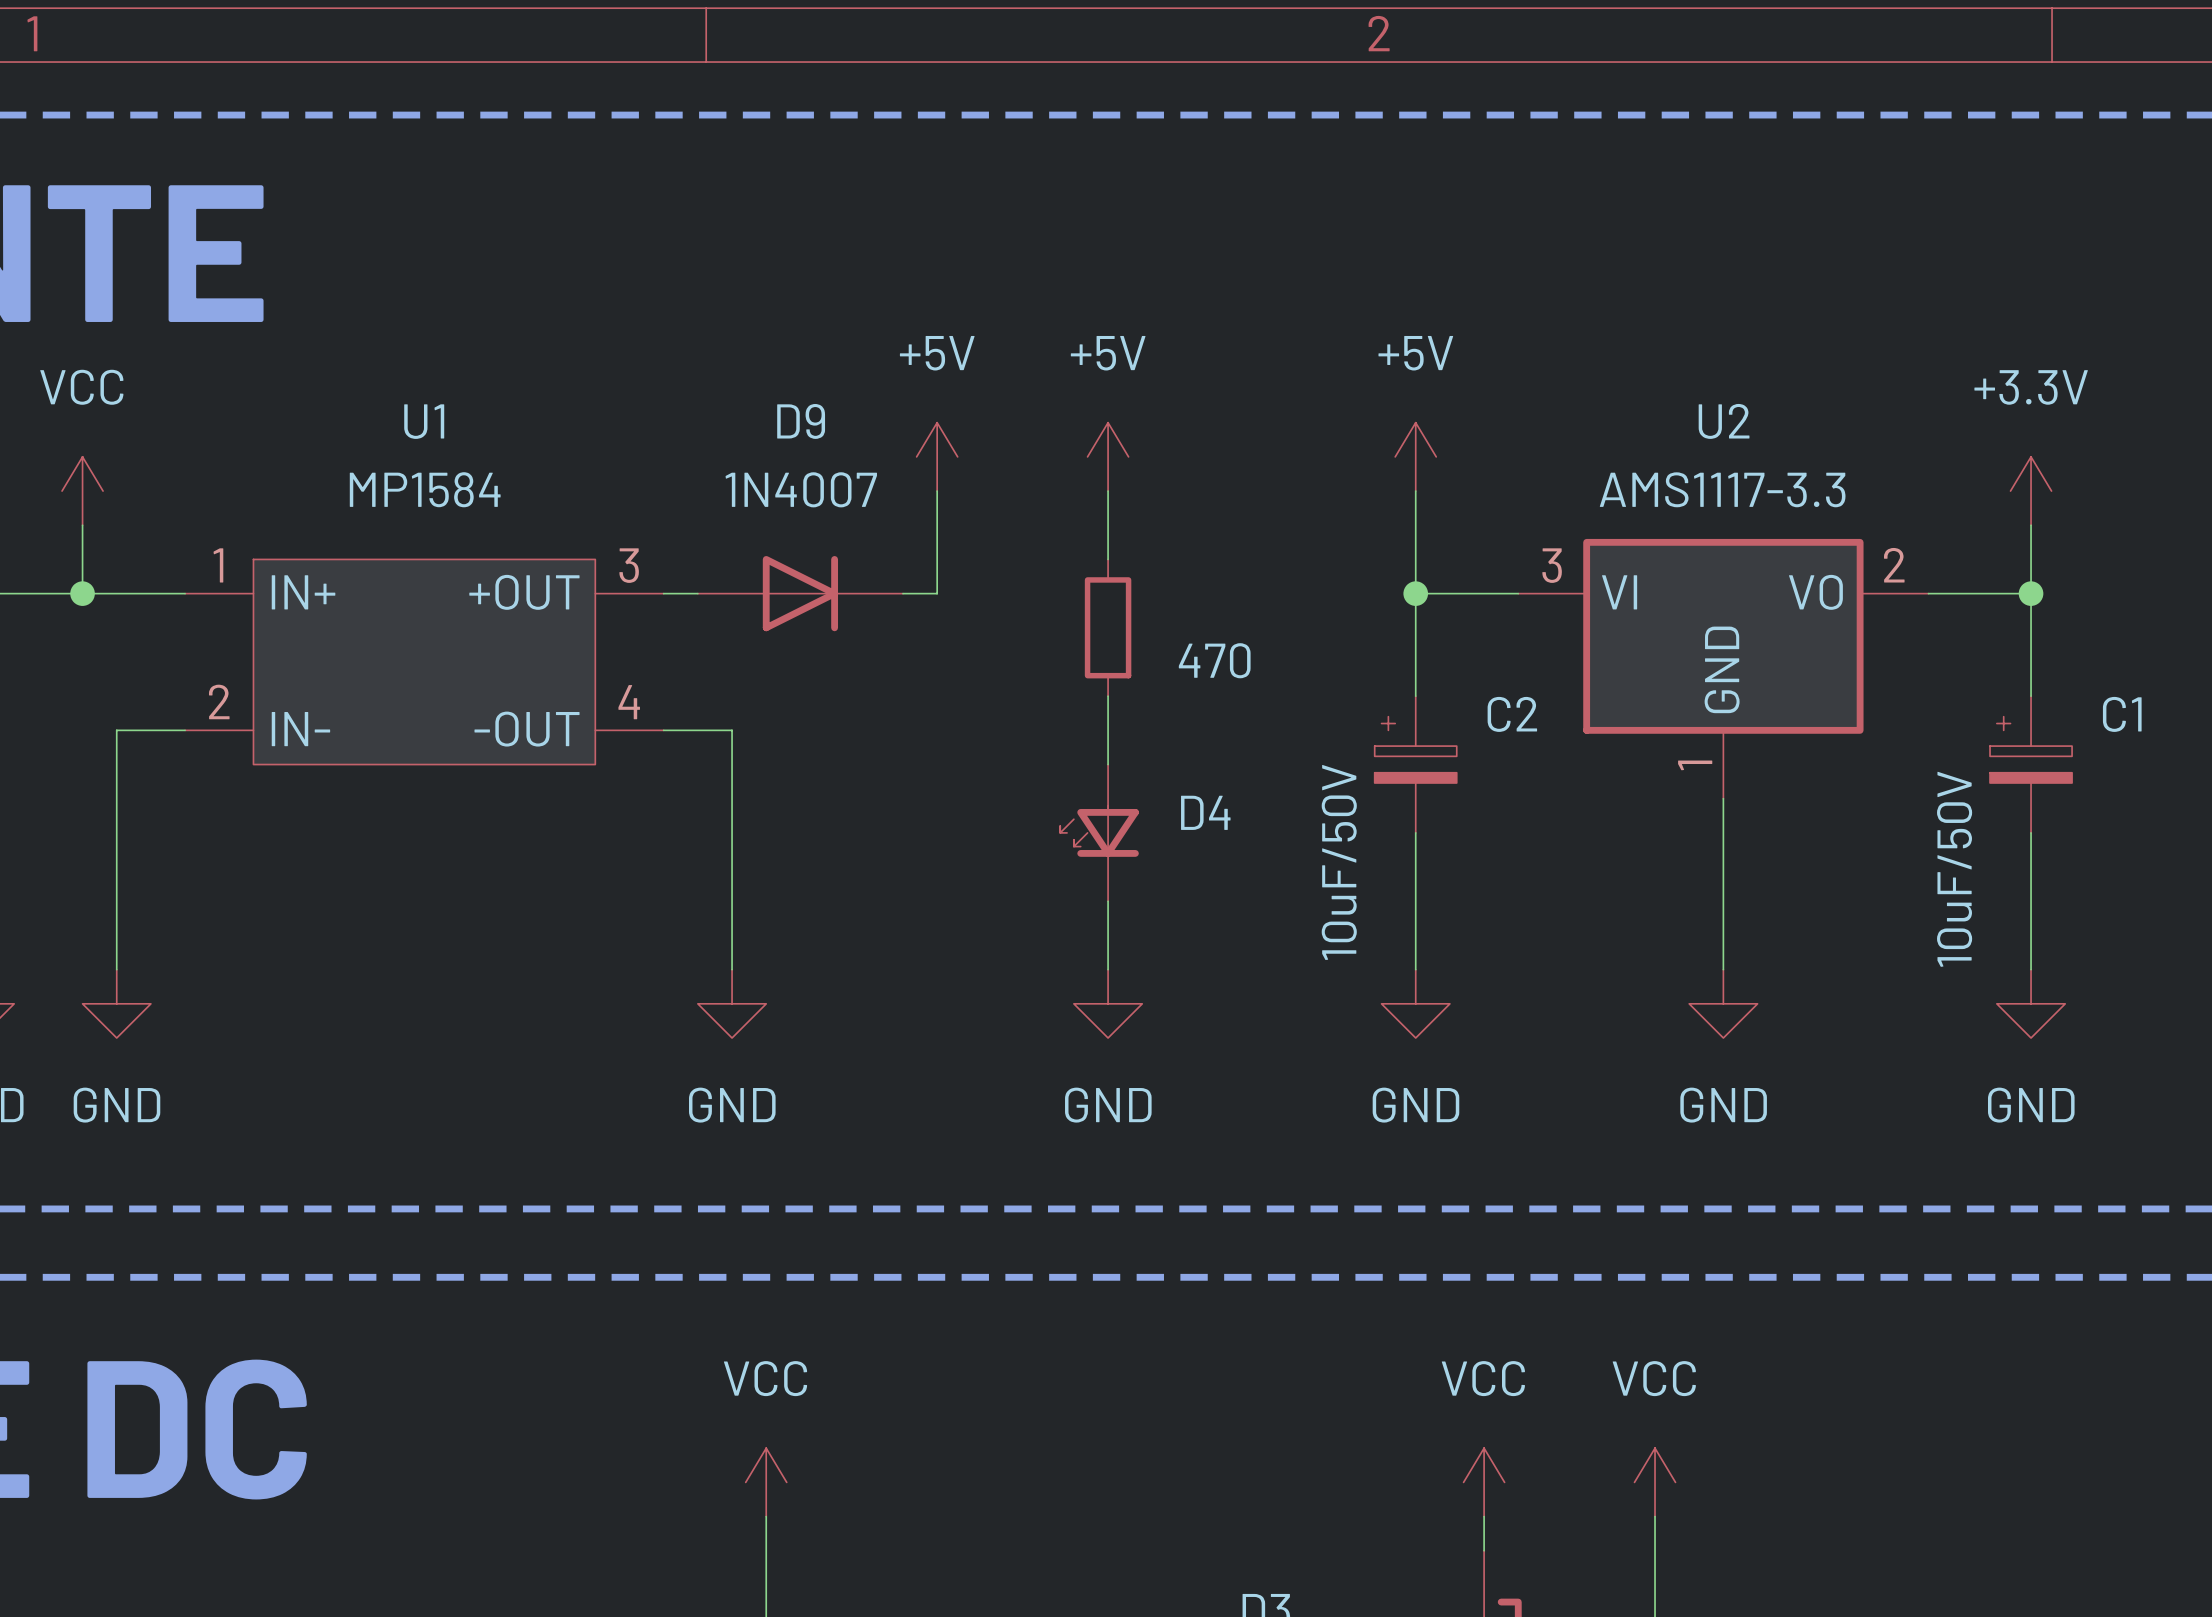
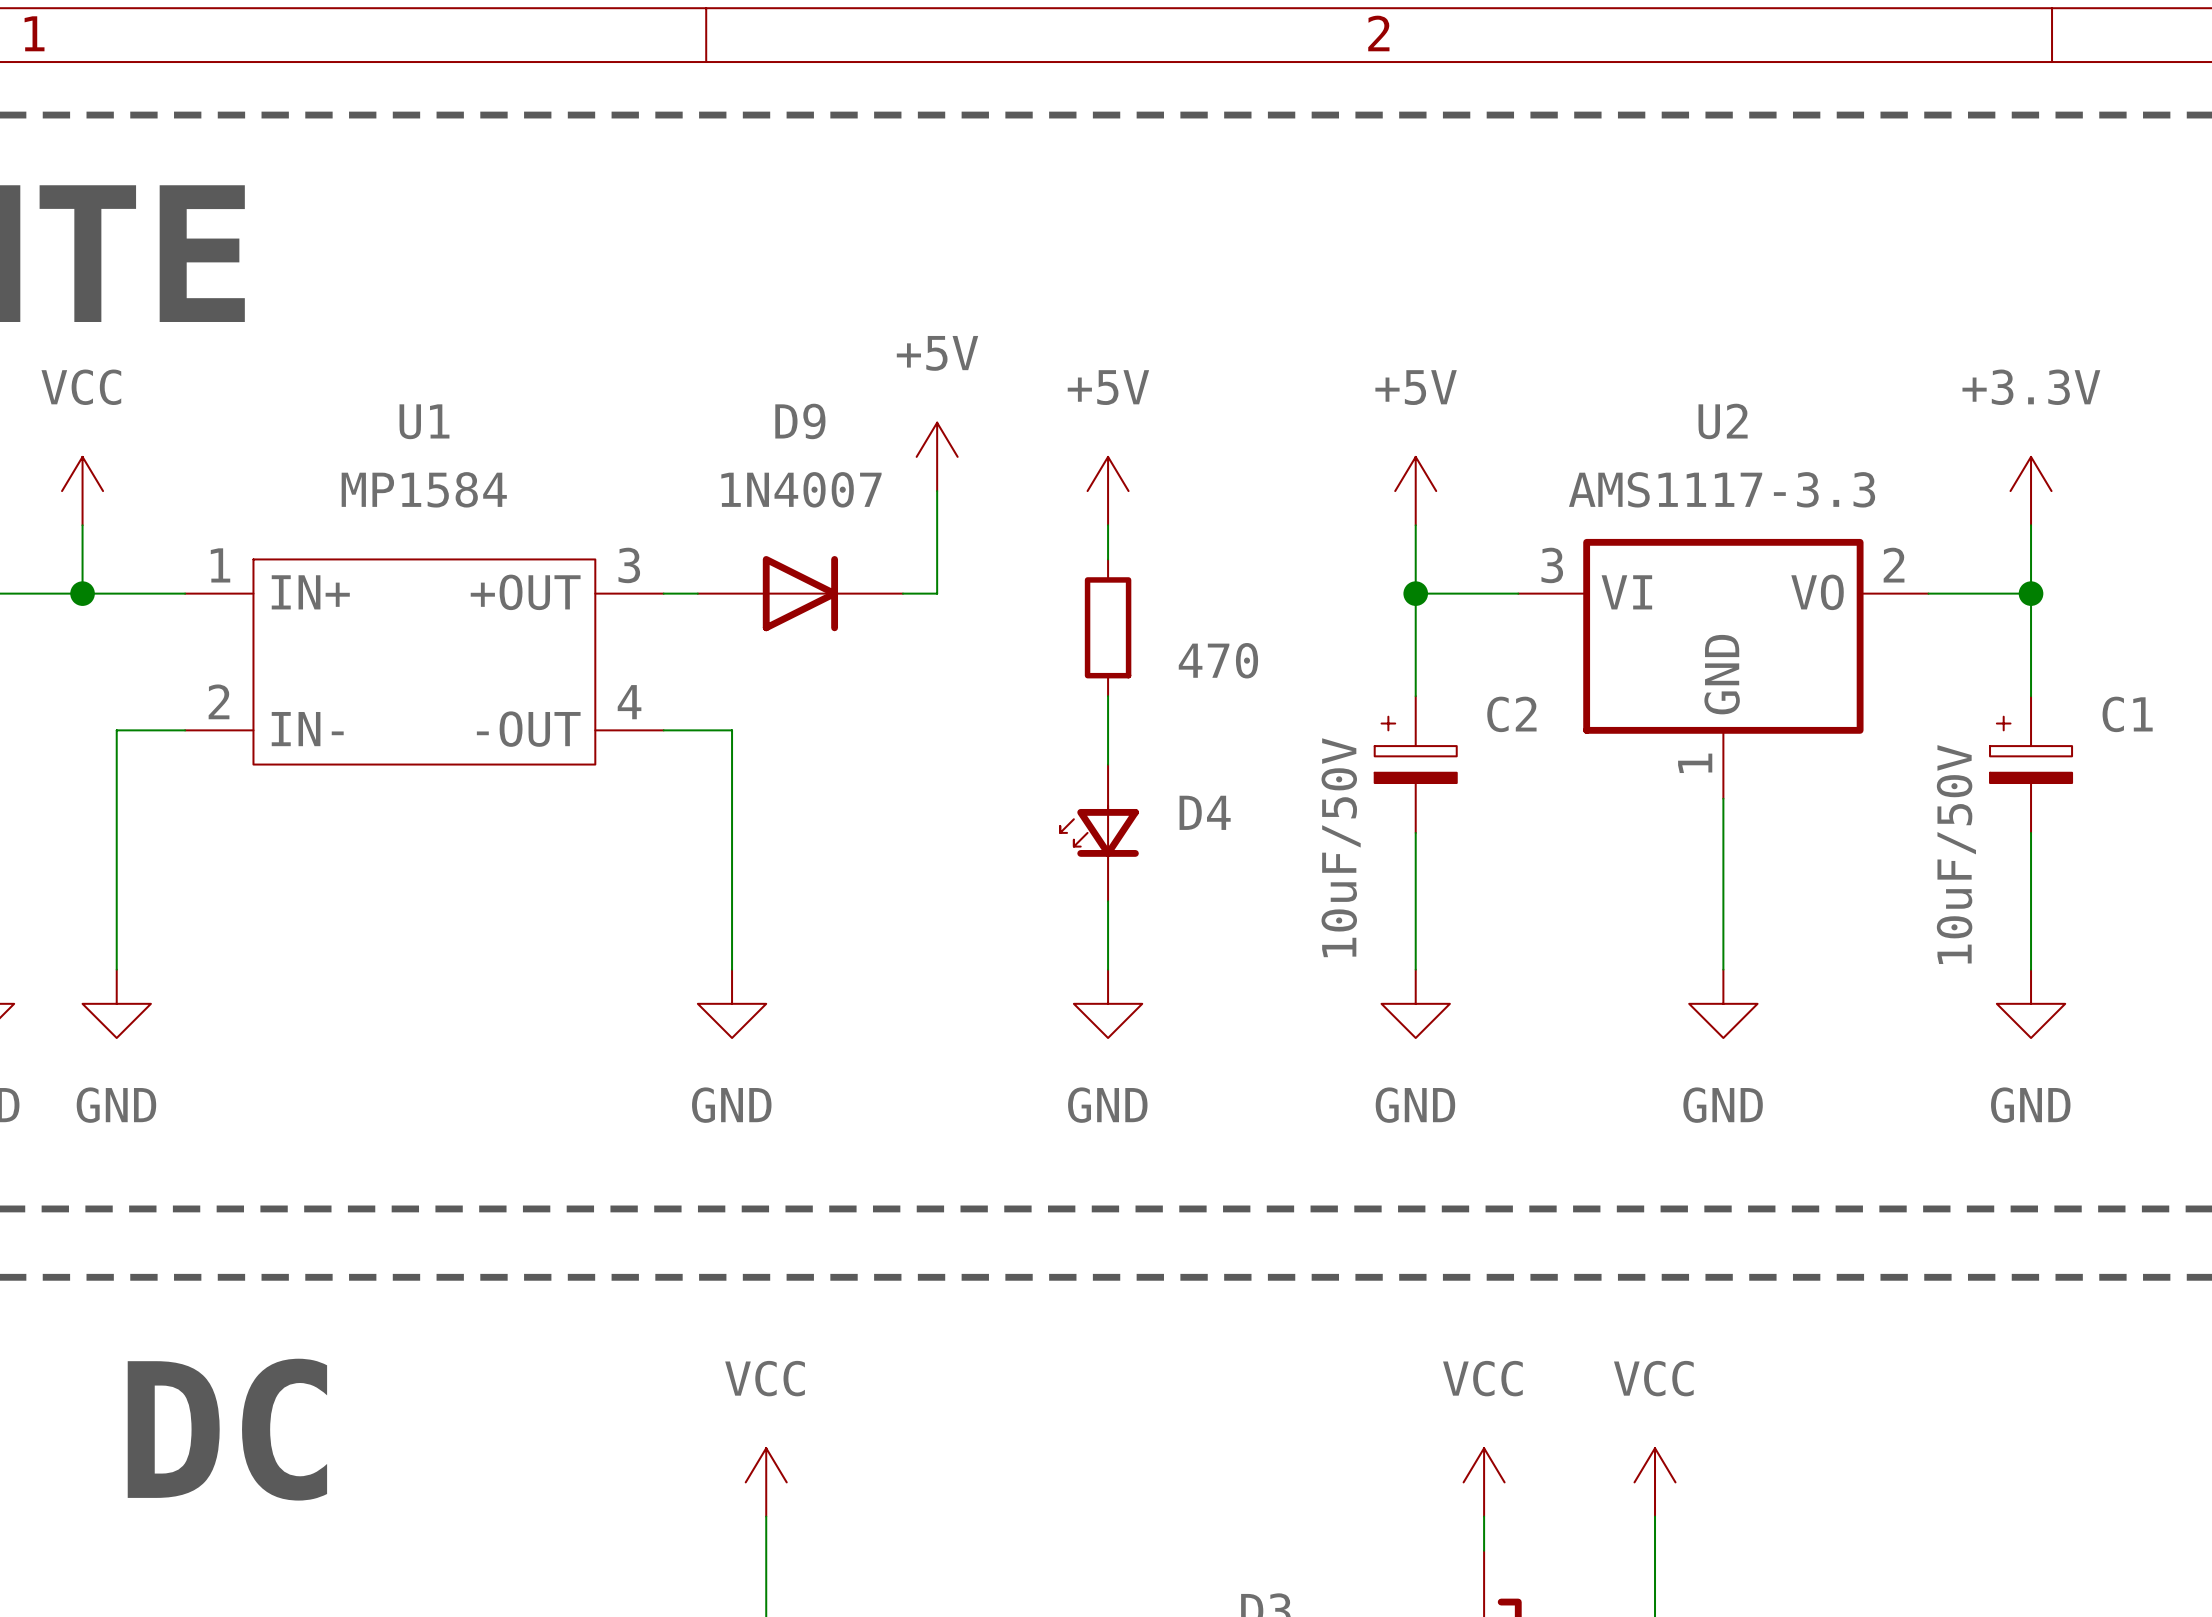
power symbol position: +5V (1108, 456) -> +5V (1108, 491)
power symbol position: +5V (1415, 456) -> +5V (1415, 491)

